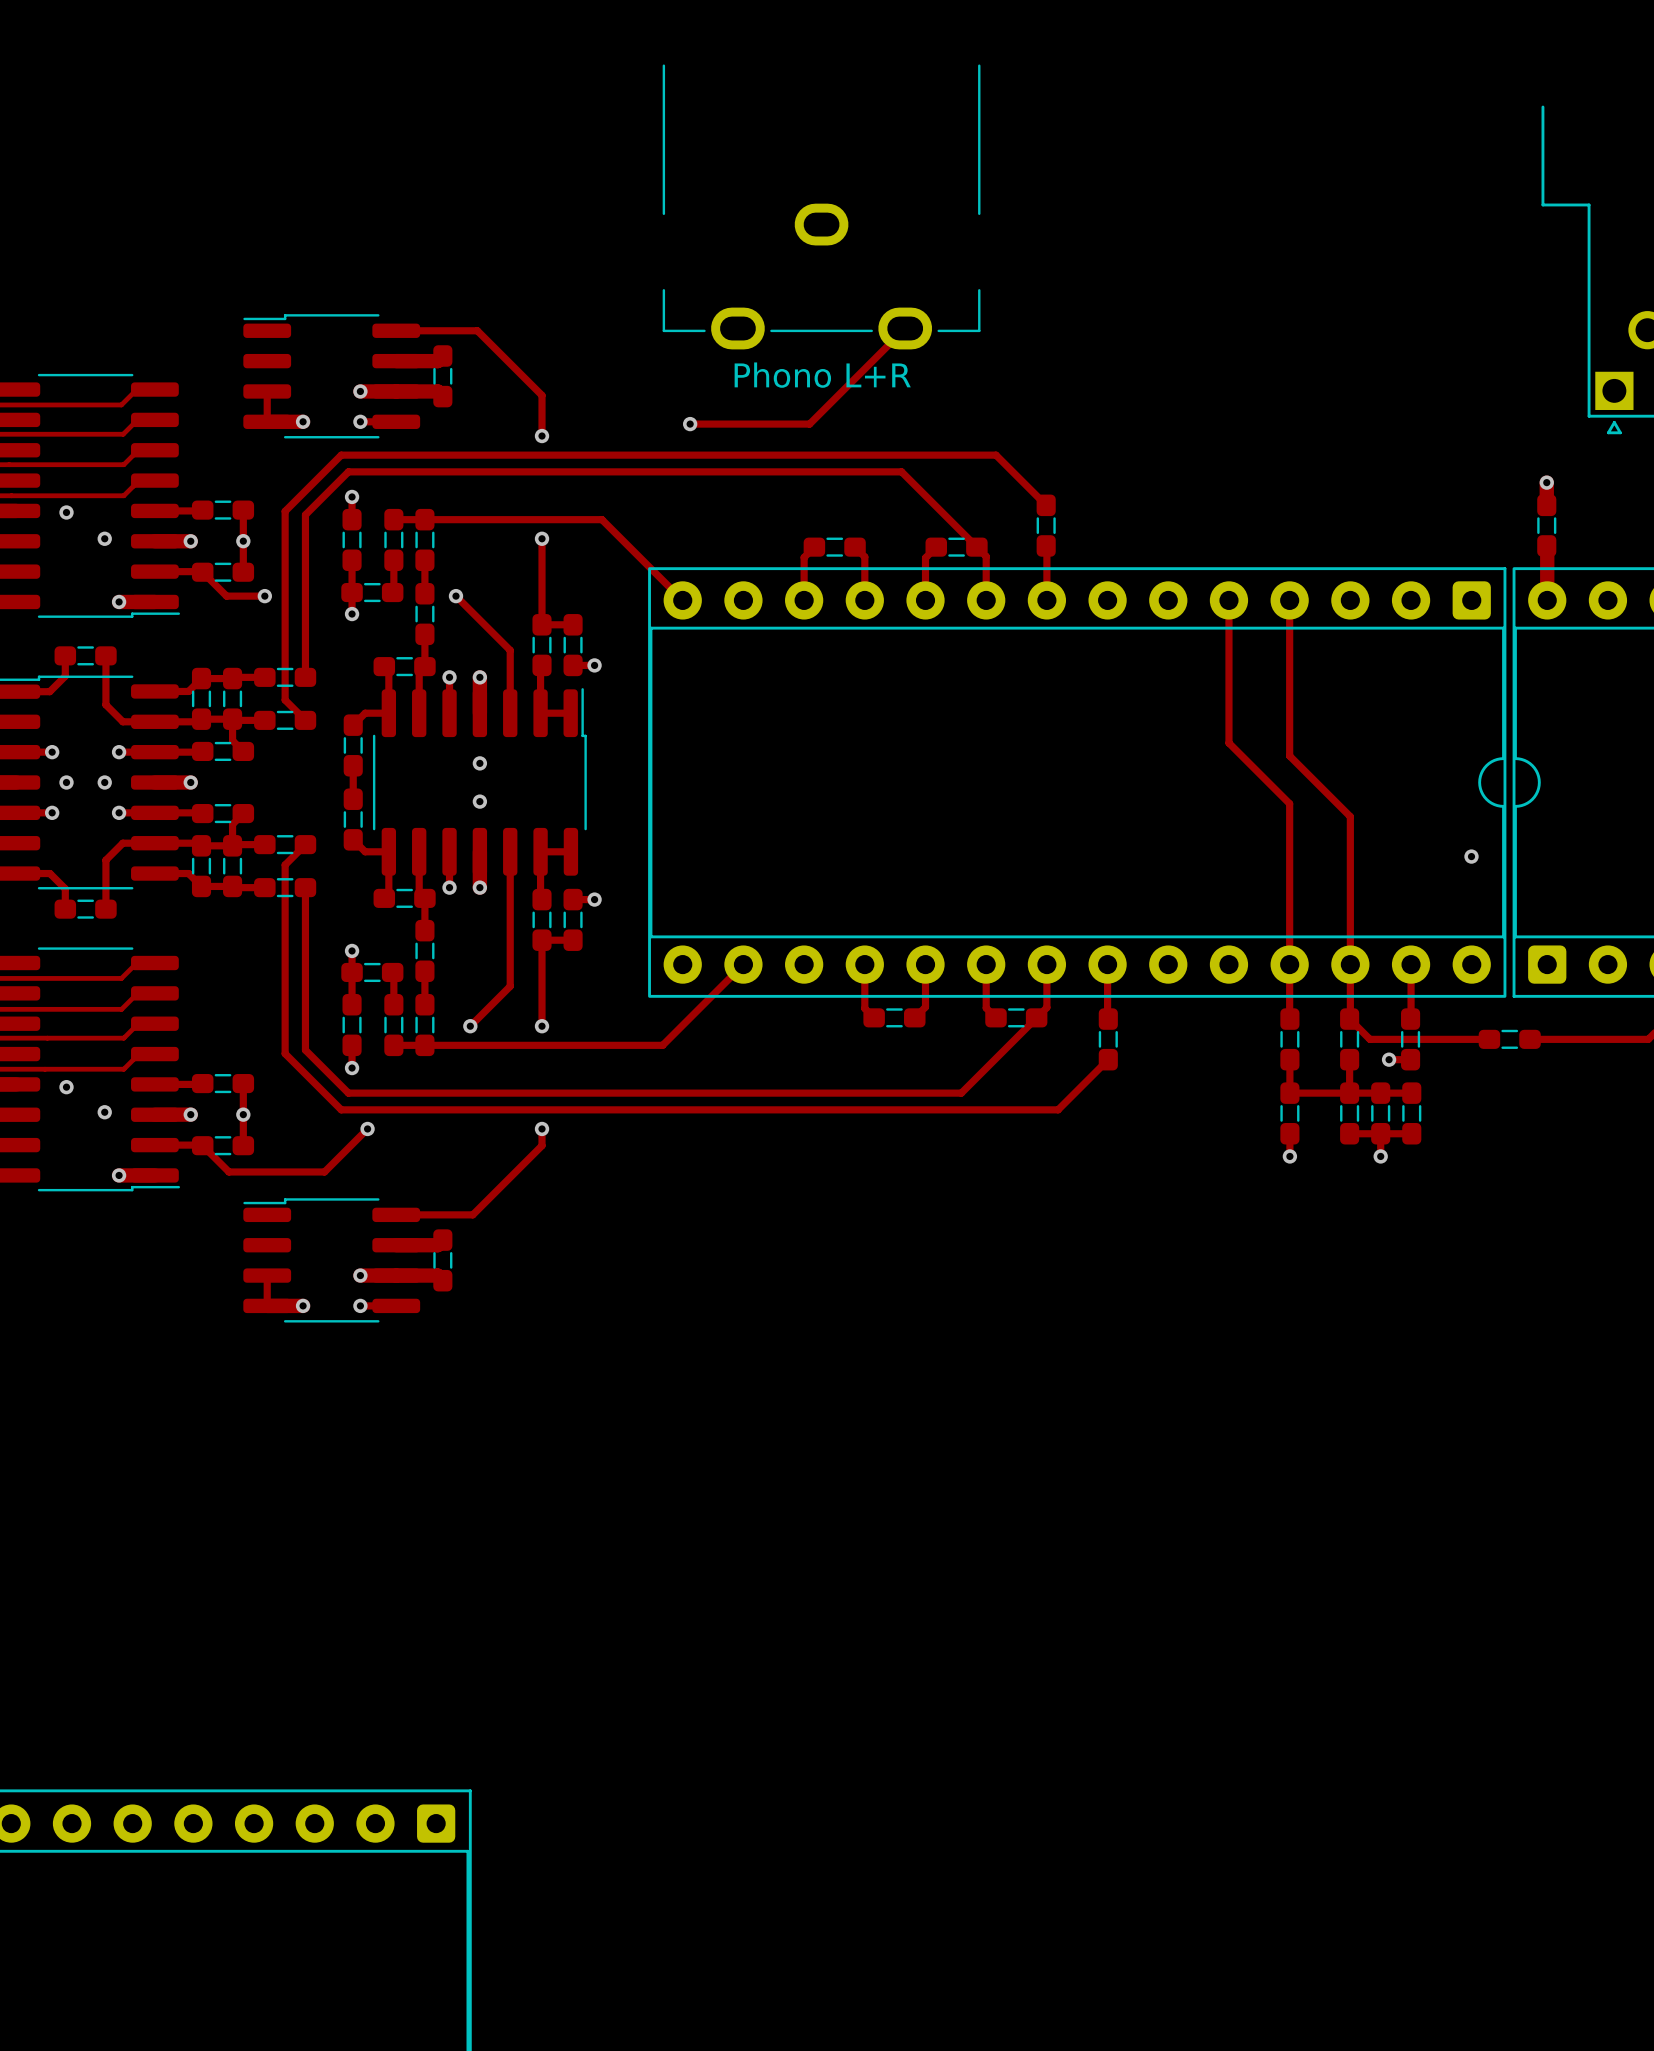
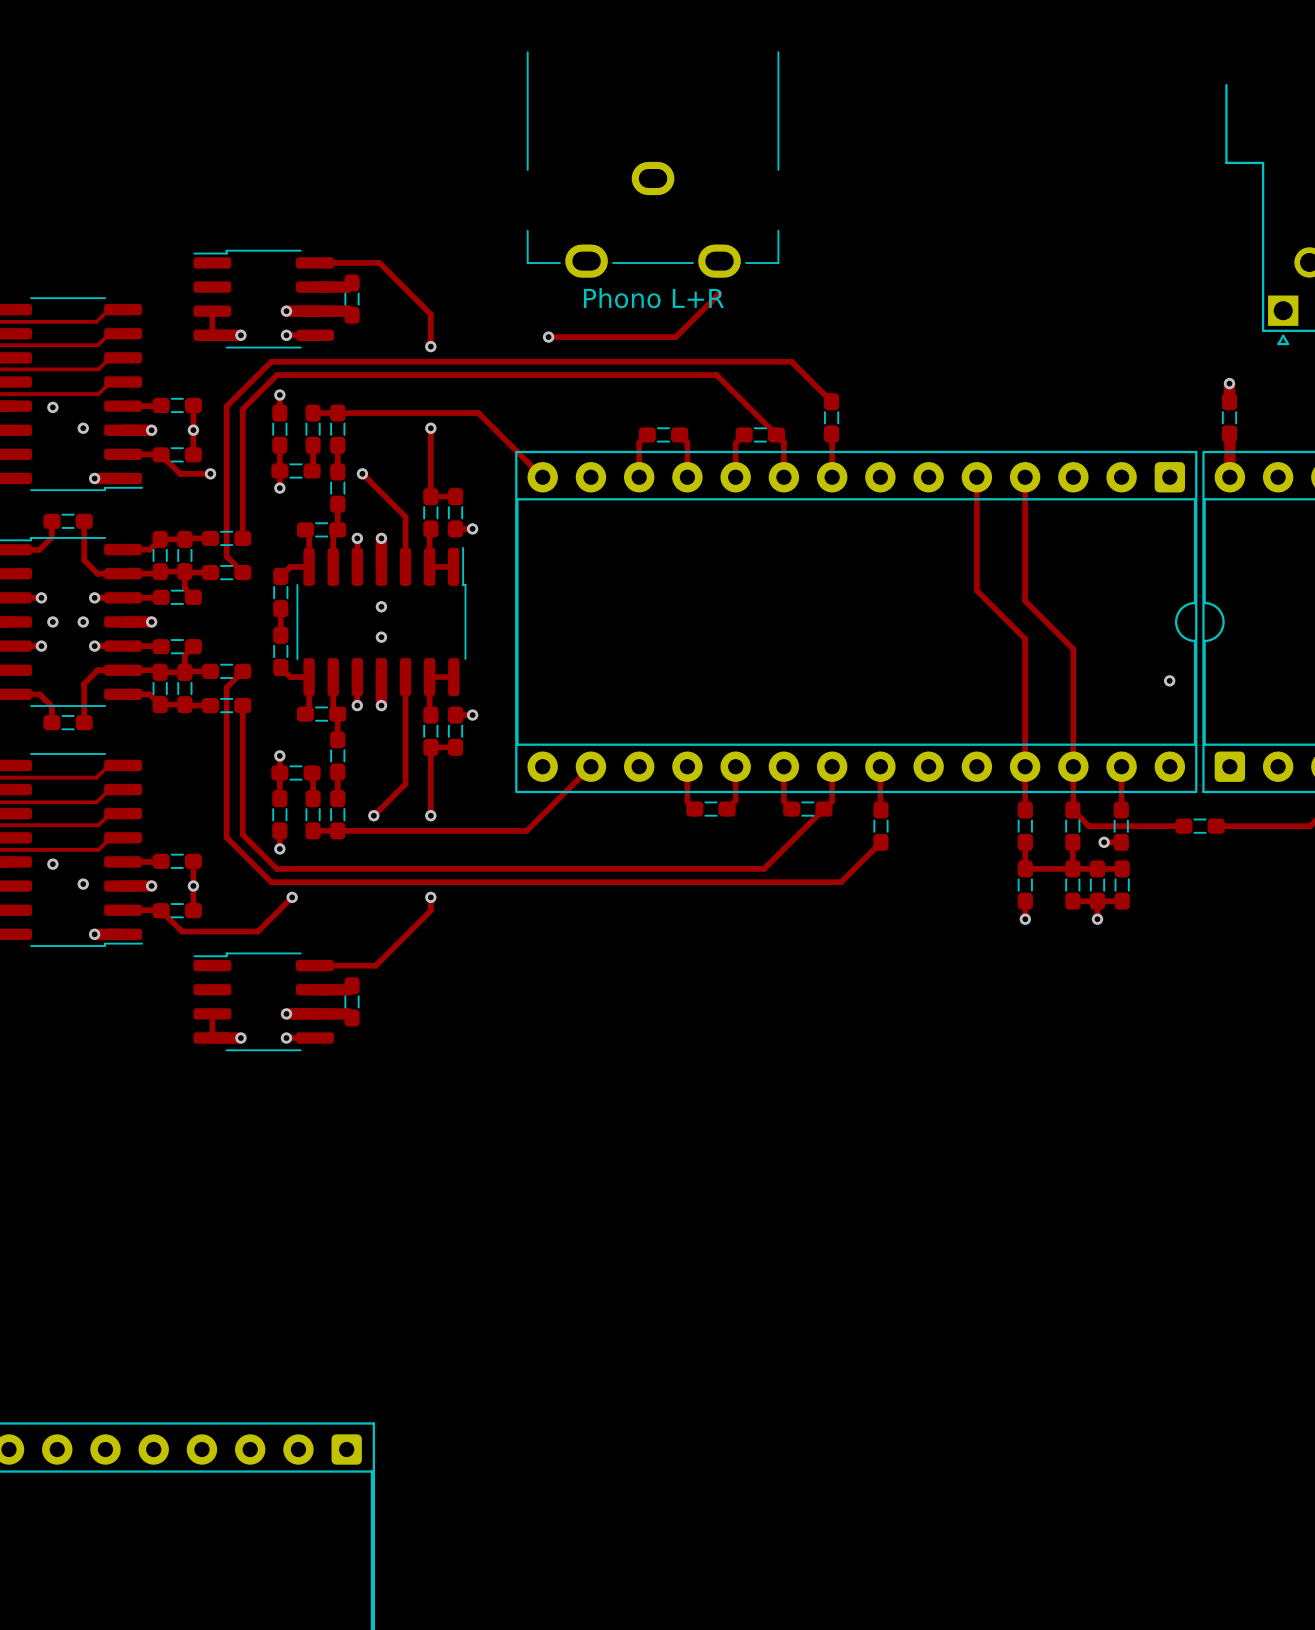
track: (905, 328) (809, 424) -> (719, 293) (675, 337) (643, 337)

